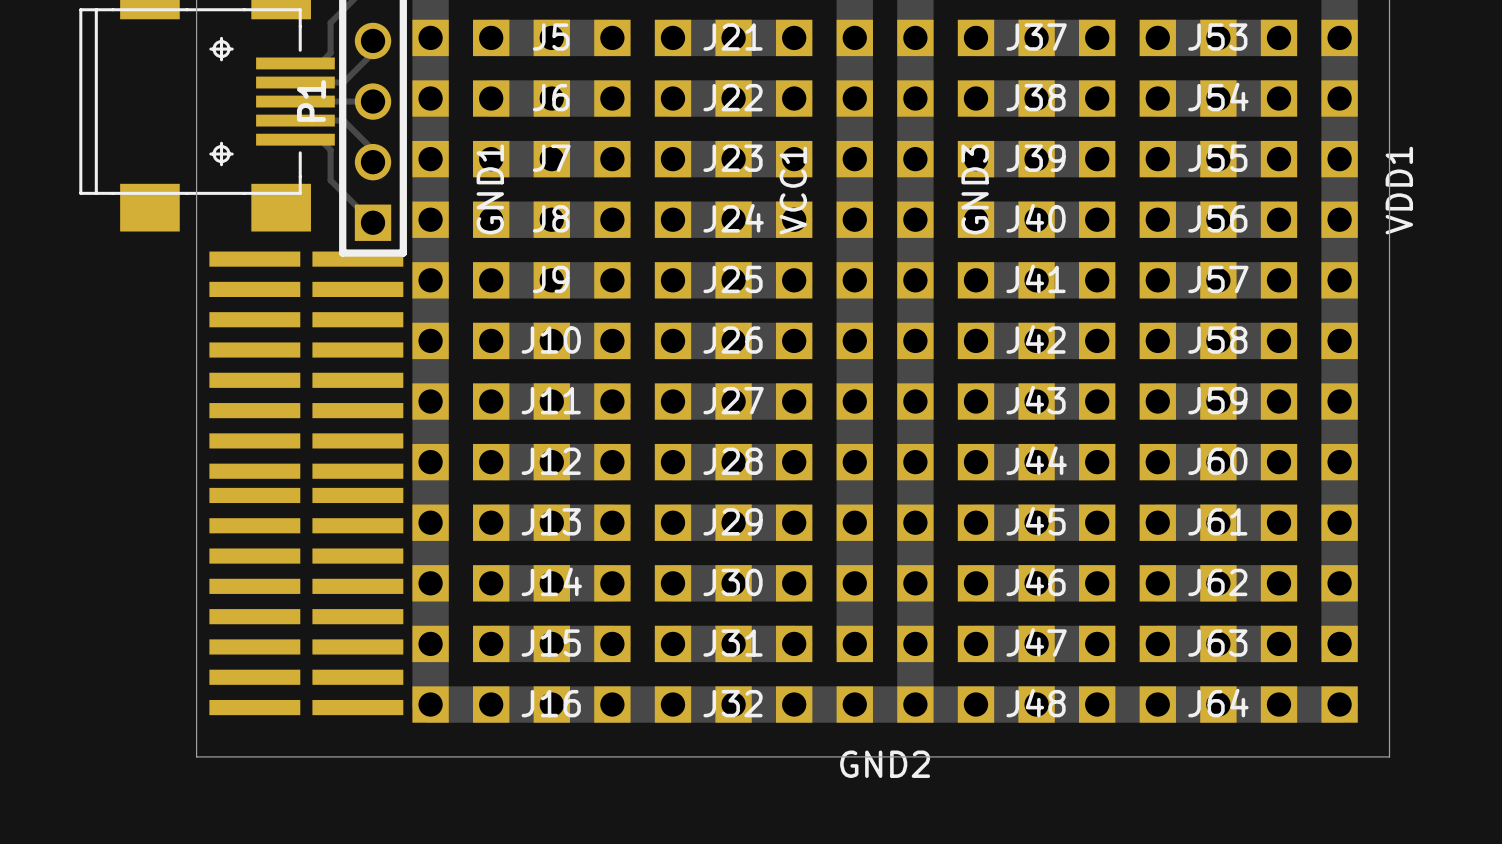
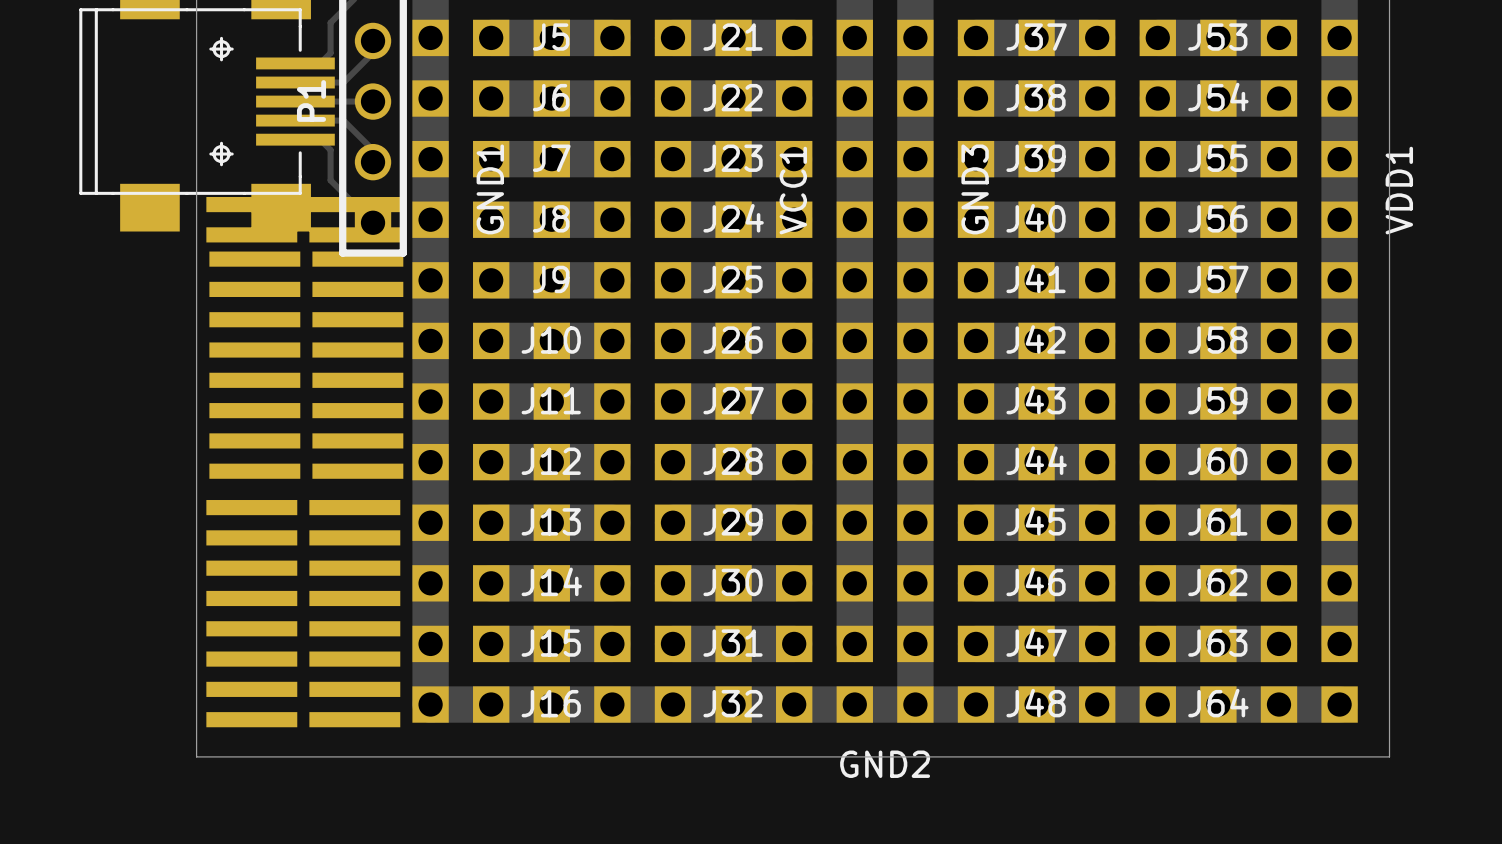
part: none -> (303, 219)
part position: (306, 601) -> (303, 613)

